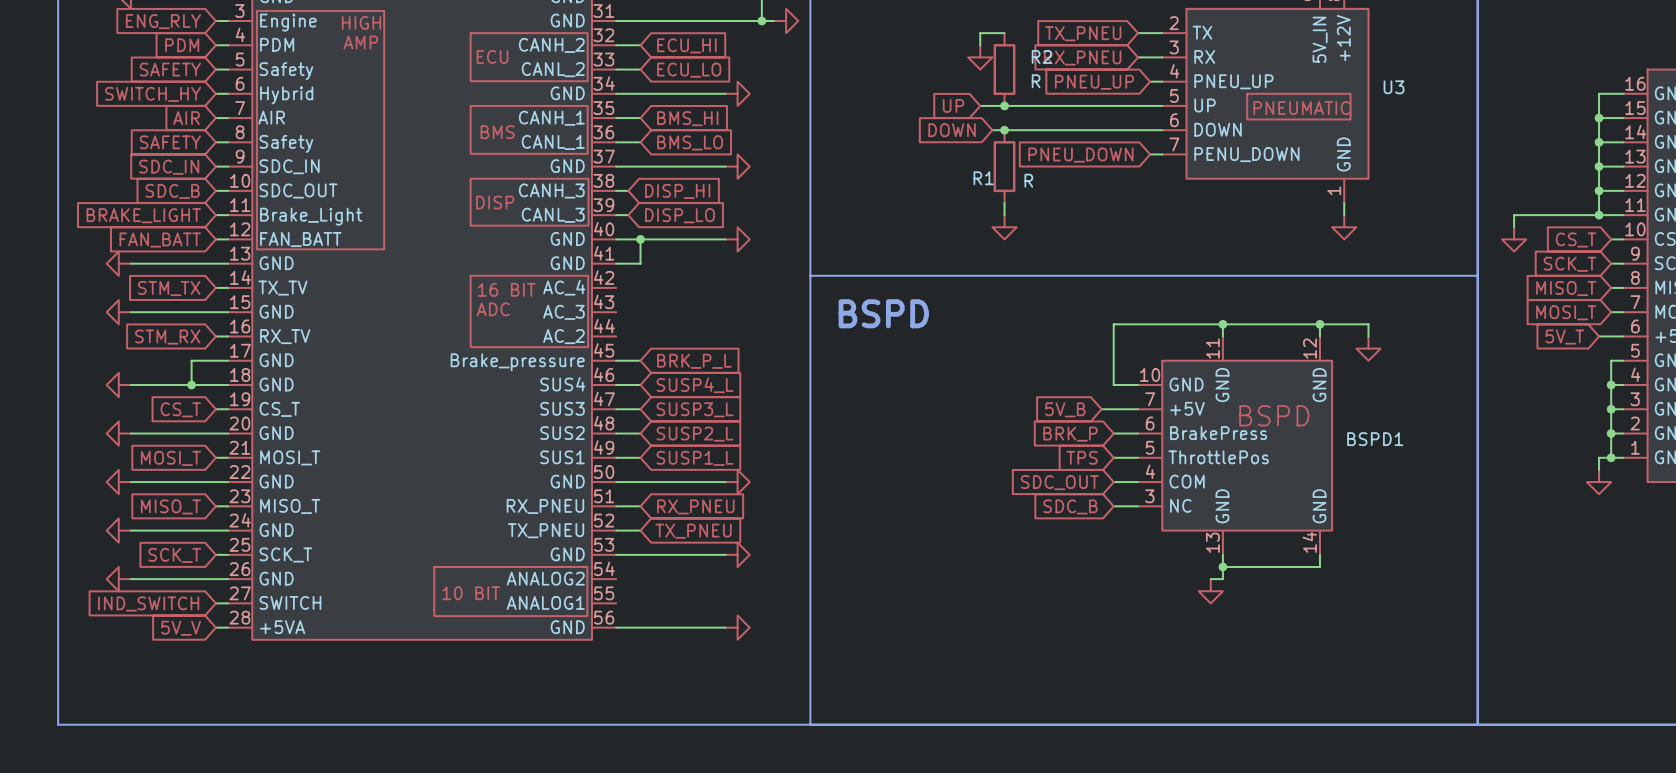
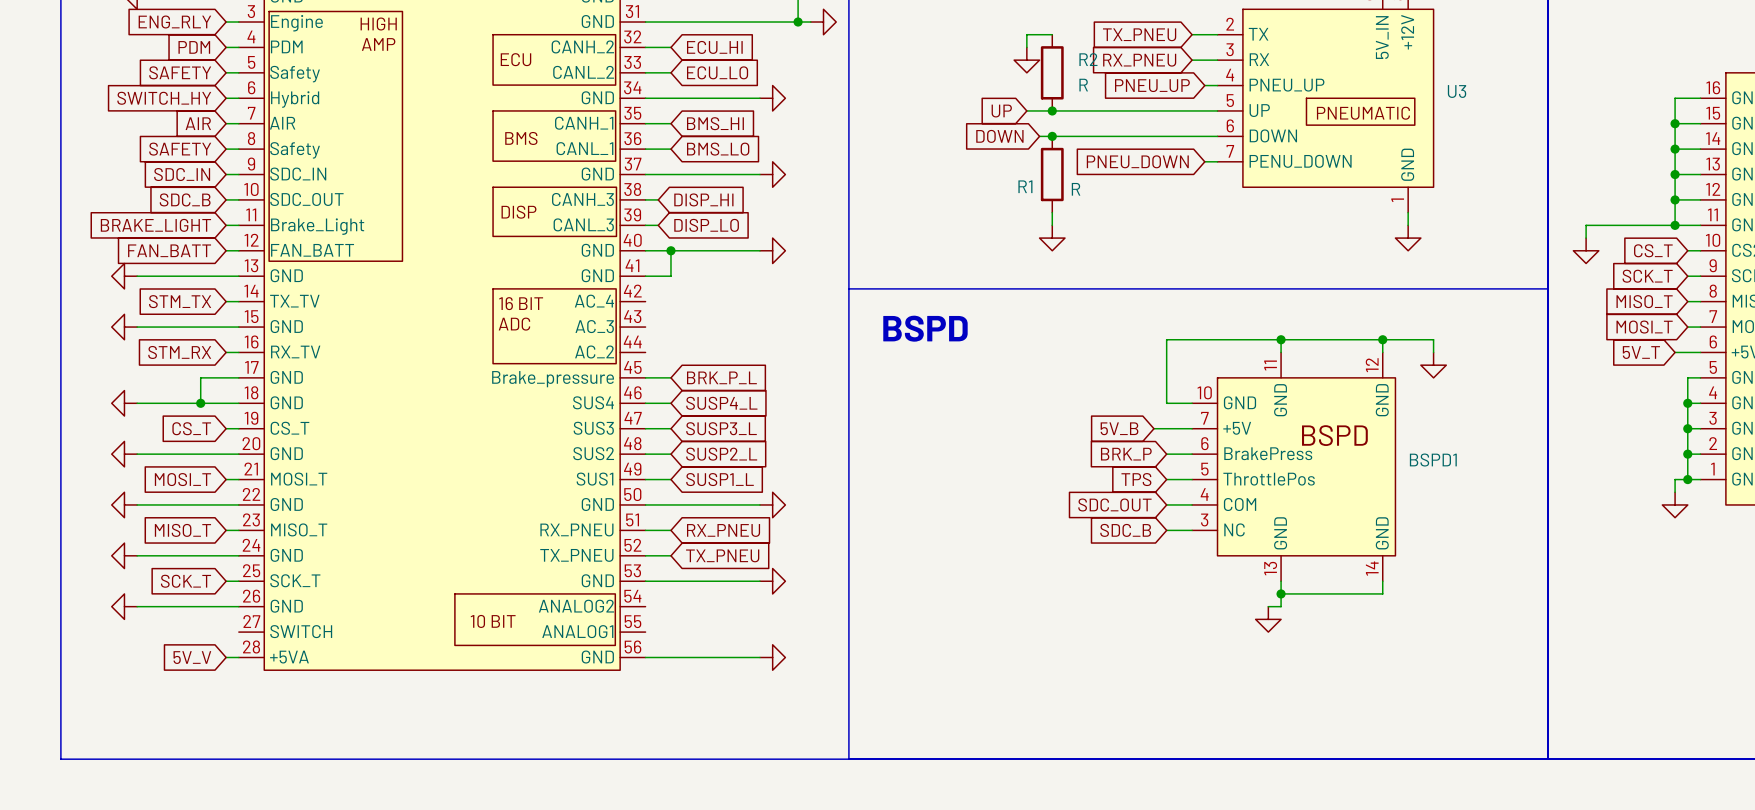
global label: IND_SWITCH (148, 603) -> none
wire: (215, 603) (228, 603) -> none

